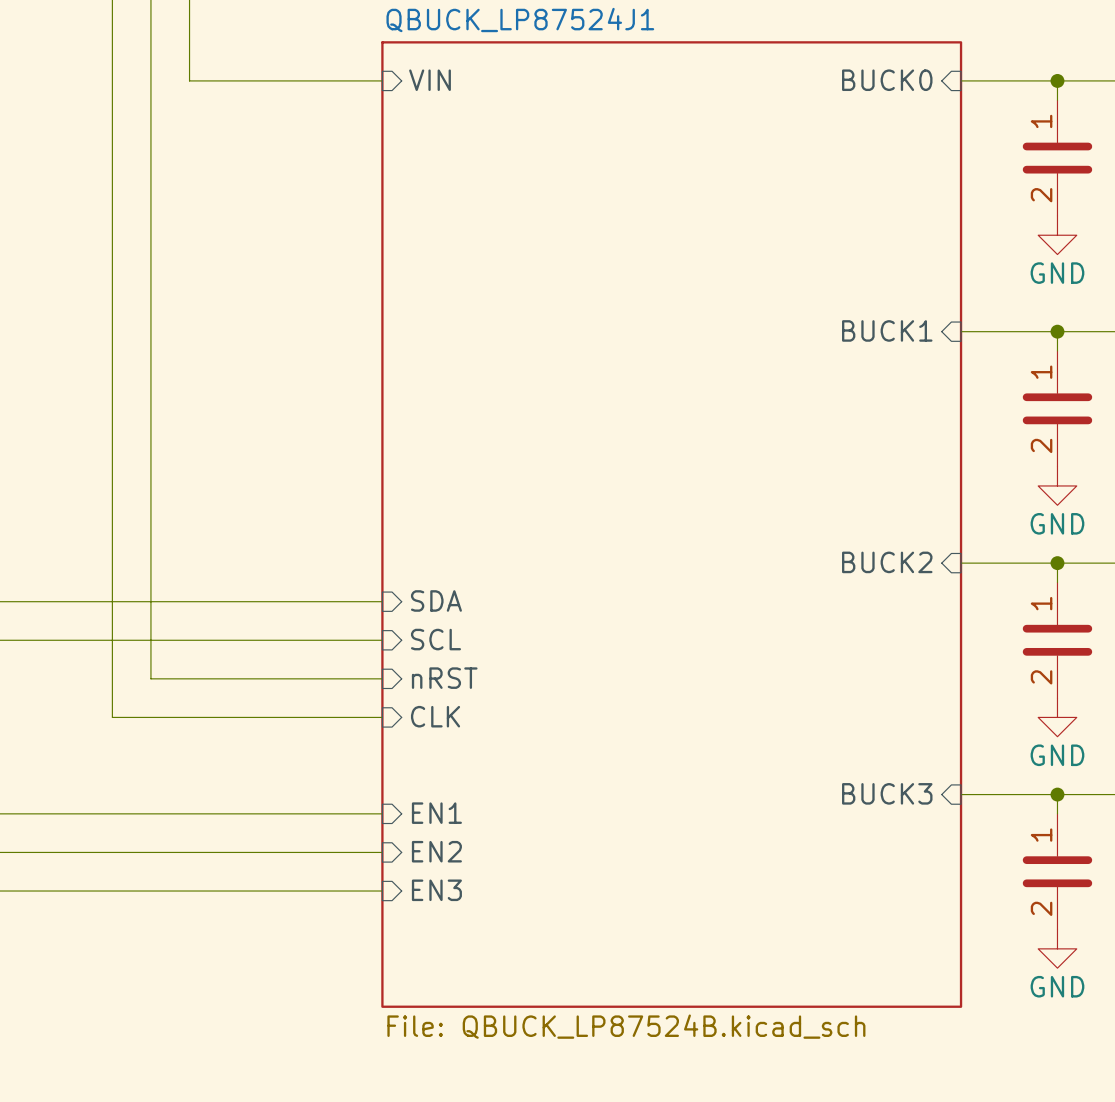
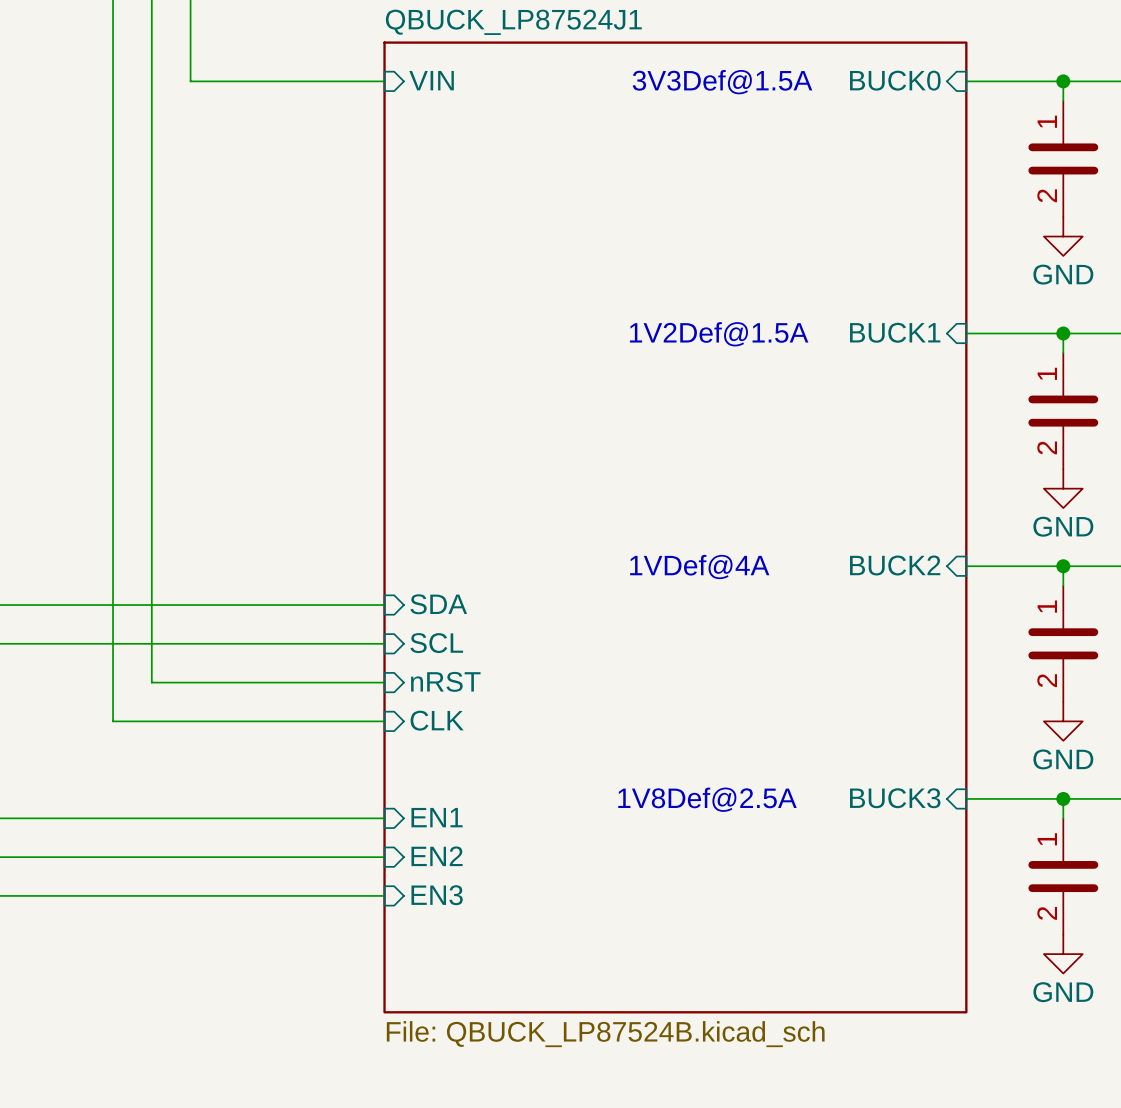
text: none -> 3V3Def@1.5A (722, 82)
text: none -> 1V2Def@1.5A (719, 334)
text: none -> 1VDef@4A (699, 566)
text: none -> 1V8Def@2.5A (707, 799)

